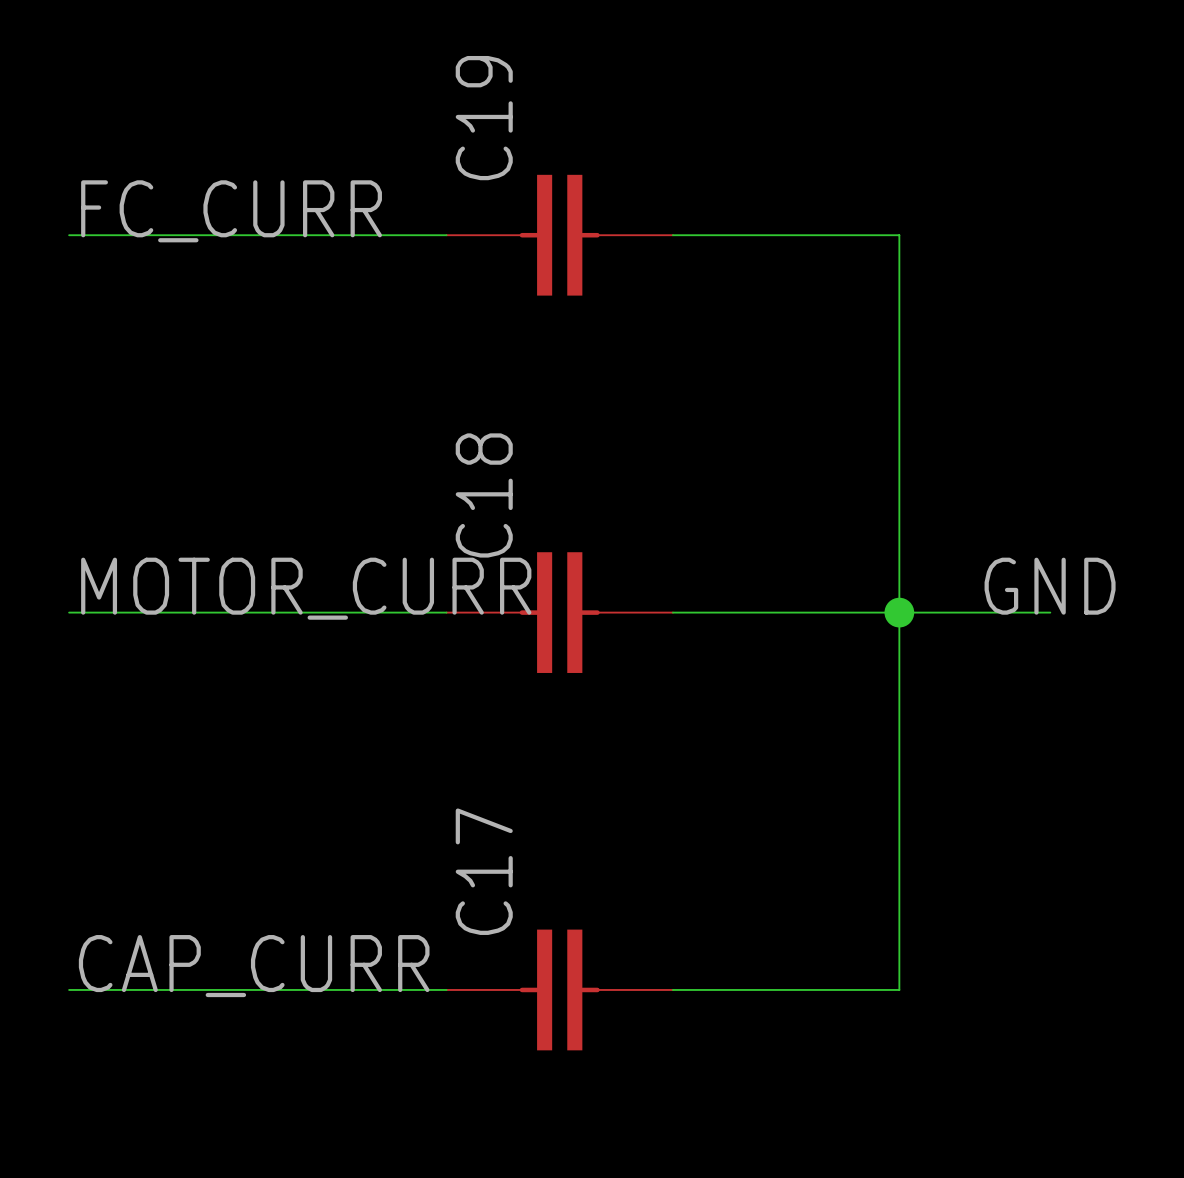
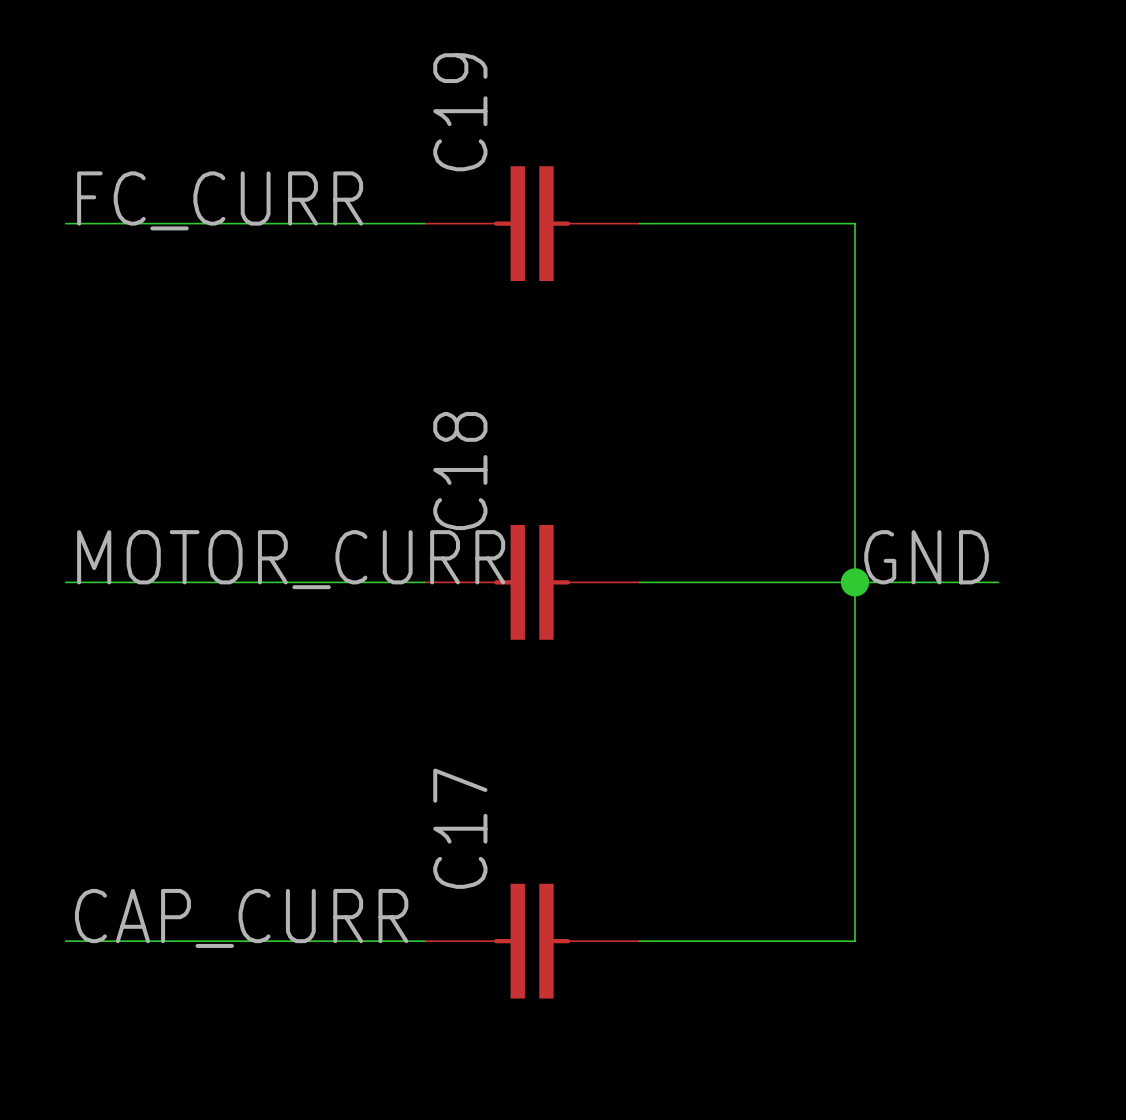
label position: GND (1050, 586) -> GND (926, 557)

